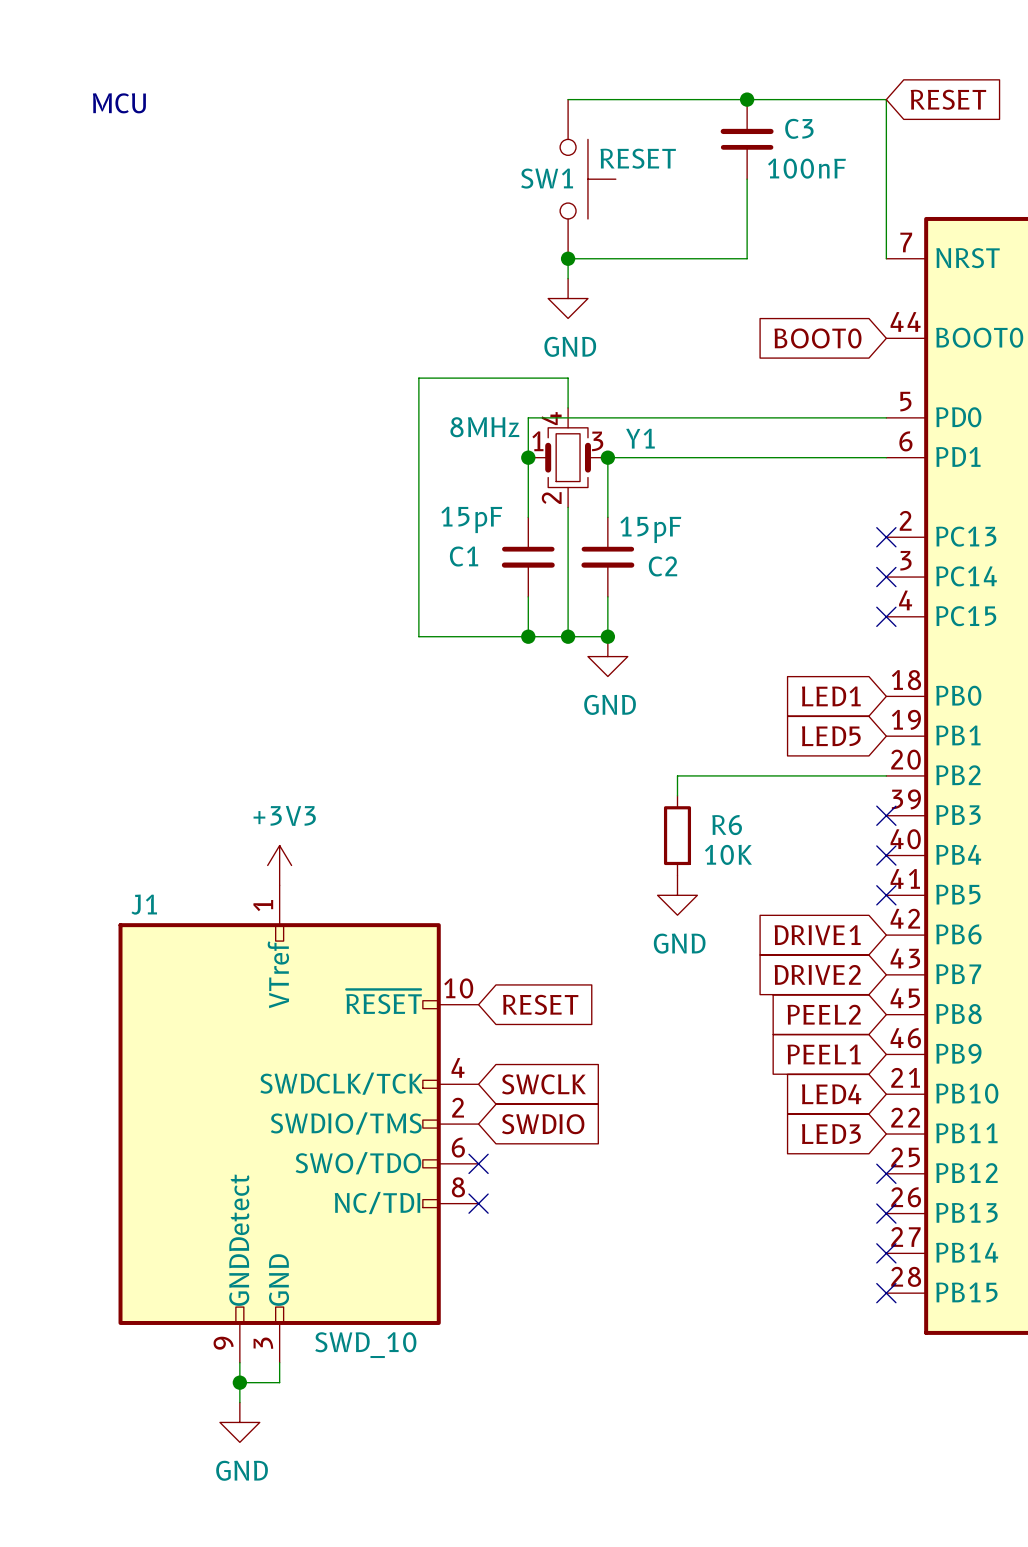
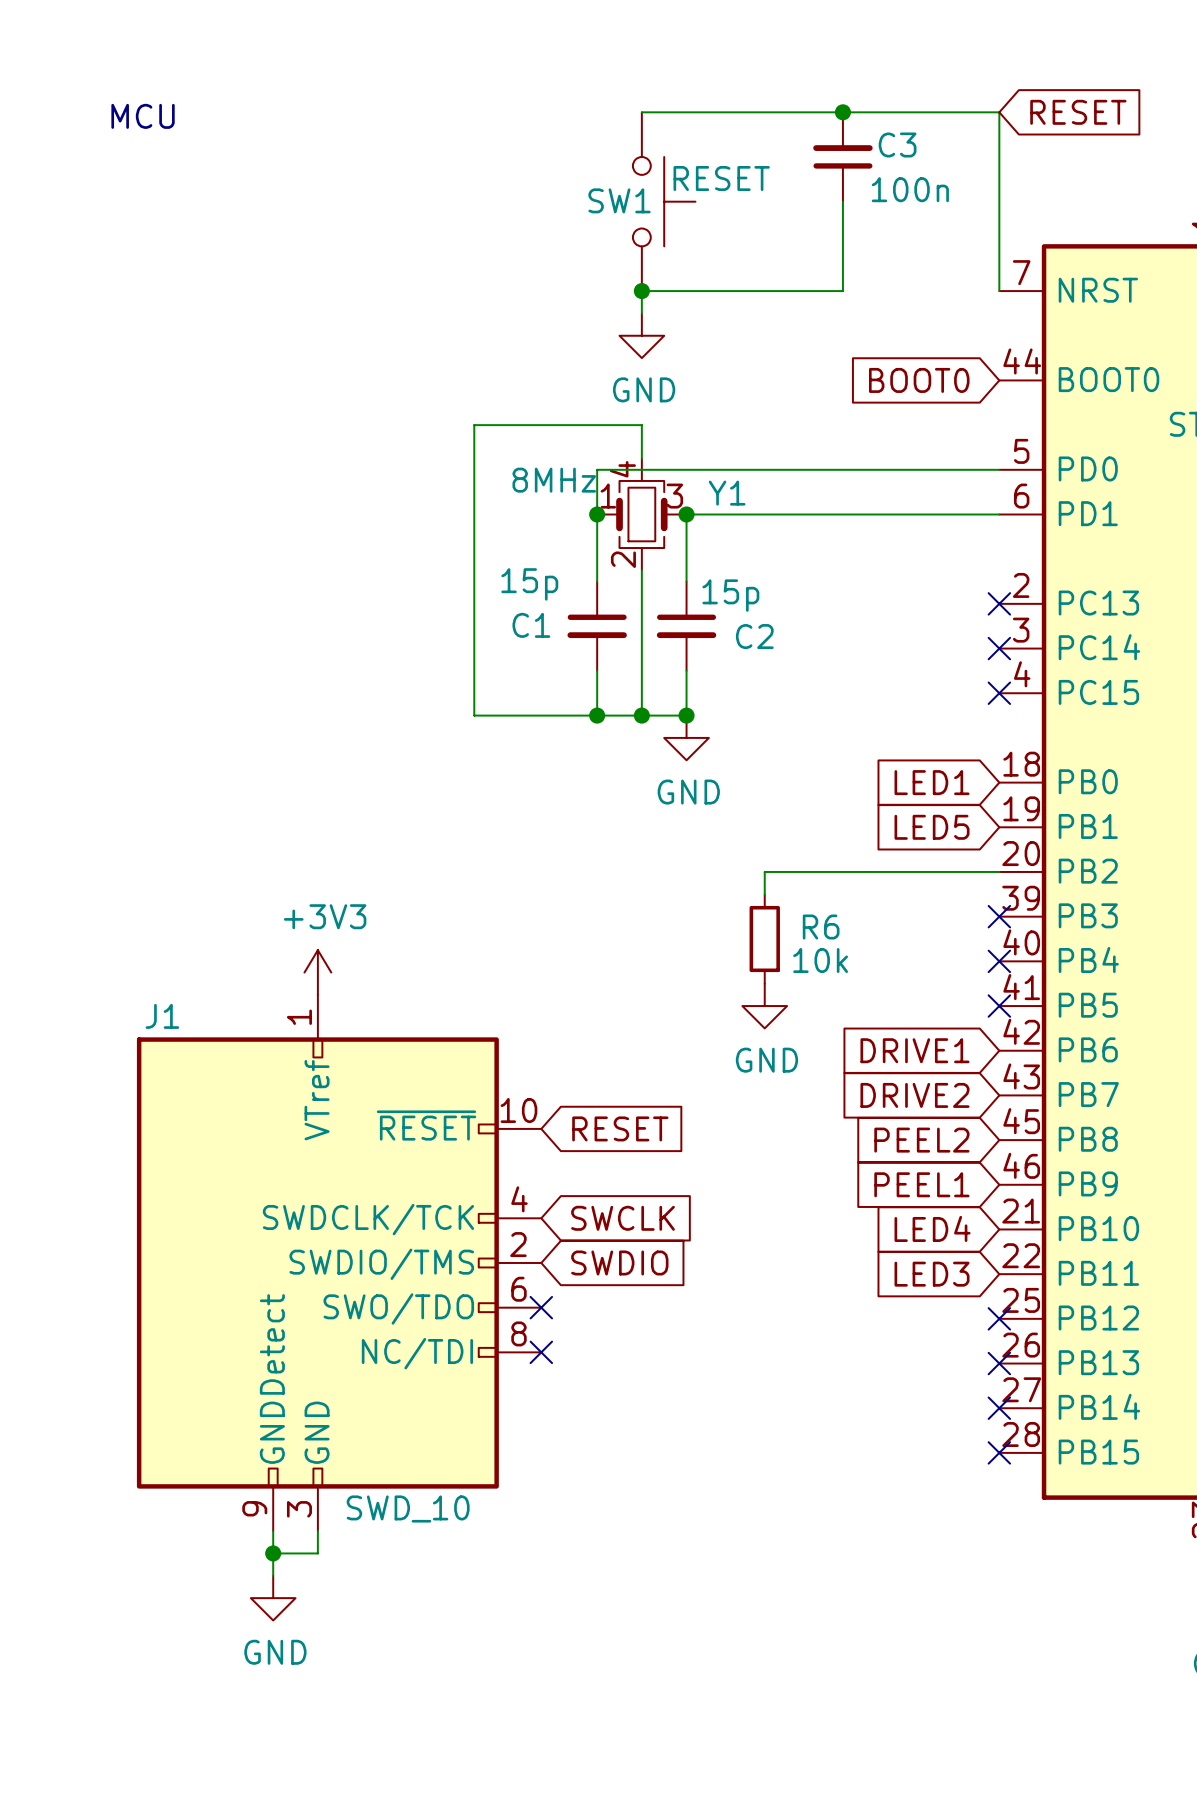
C3 value: 100nF (806, 168) -> 100n (910, 189)
C1 value: 15pF (471, 519) -> 15p (529, 584)
C2 value: 15pF (650, 529) -> 15p (730, 595)
R6 value: 10K (728, 854) -> 10k (820, 960)

